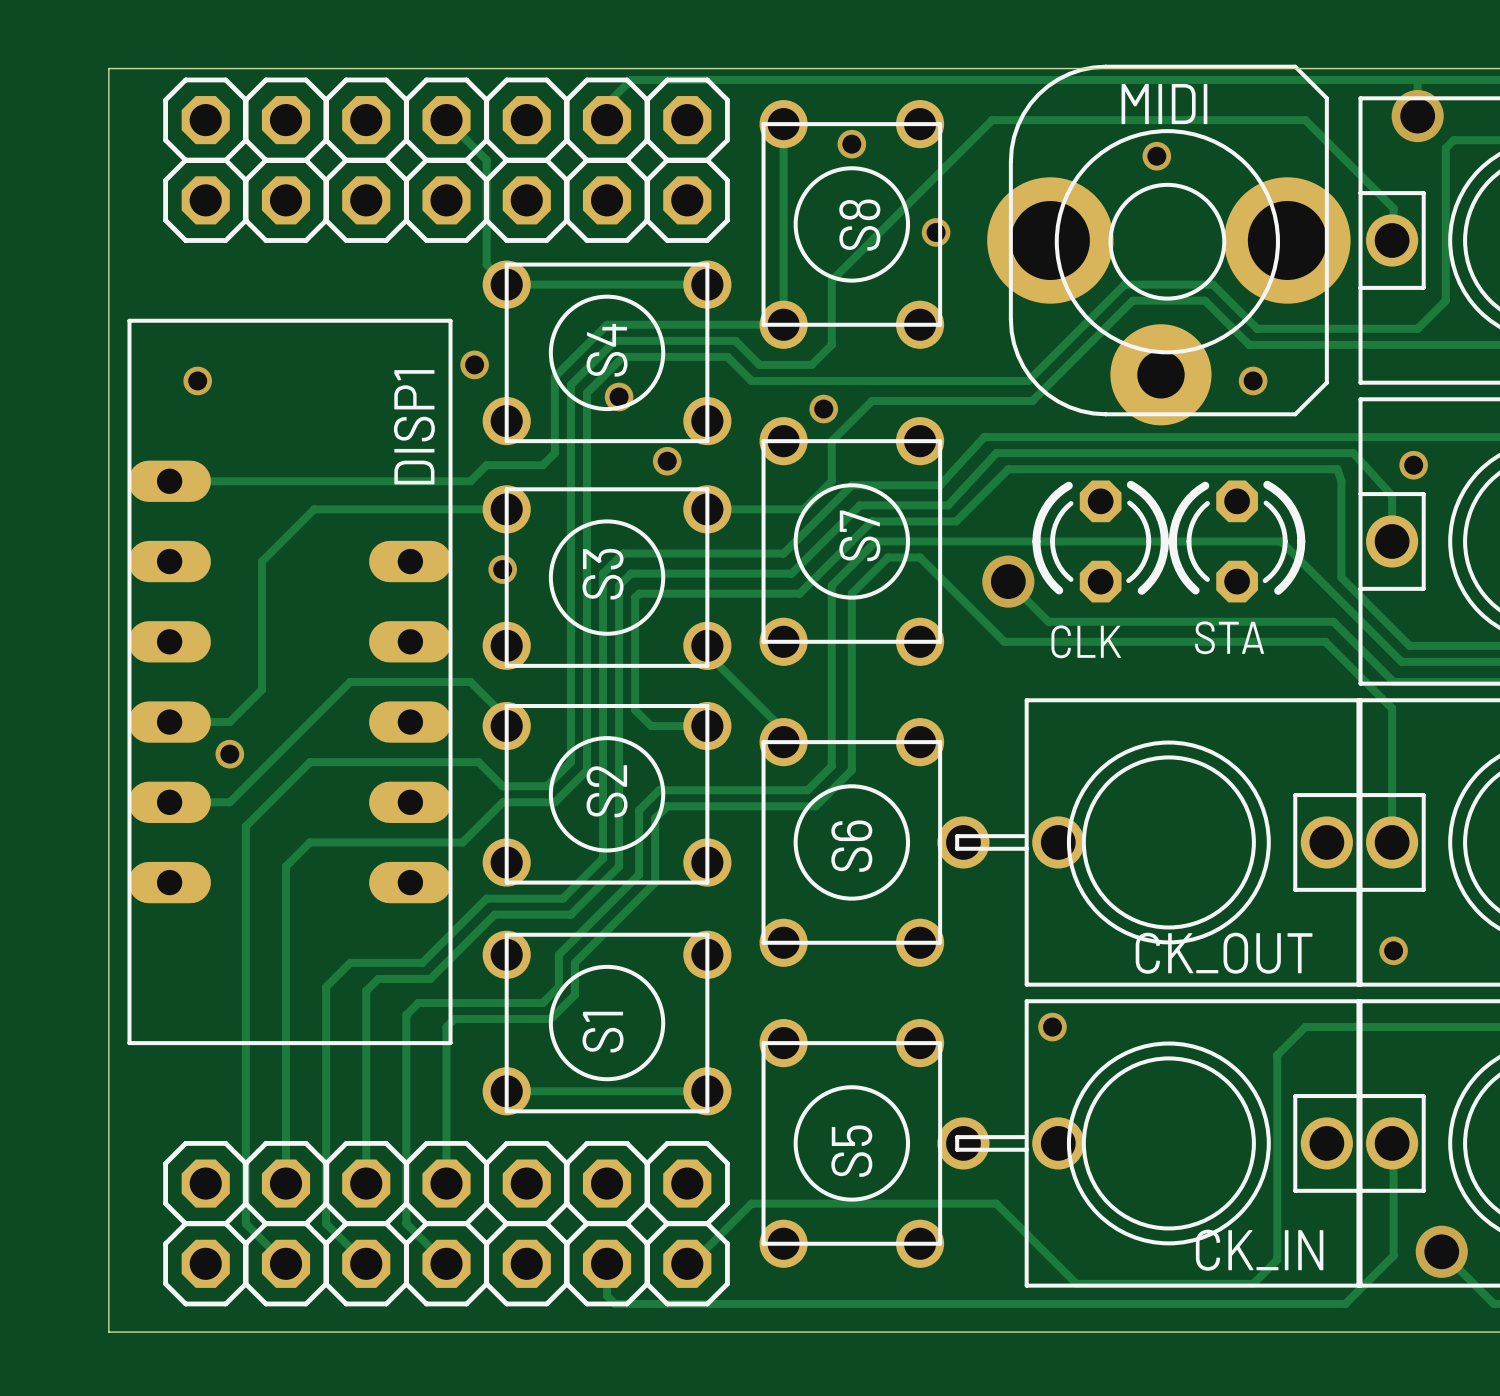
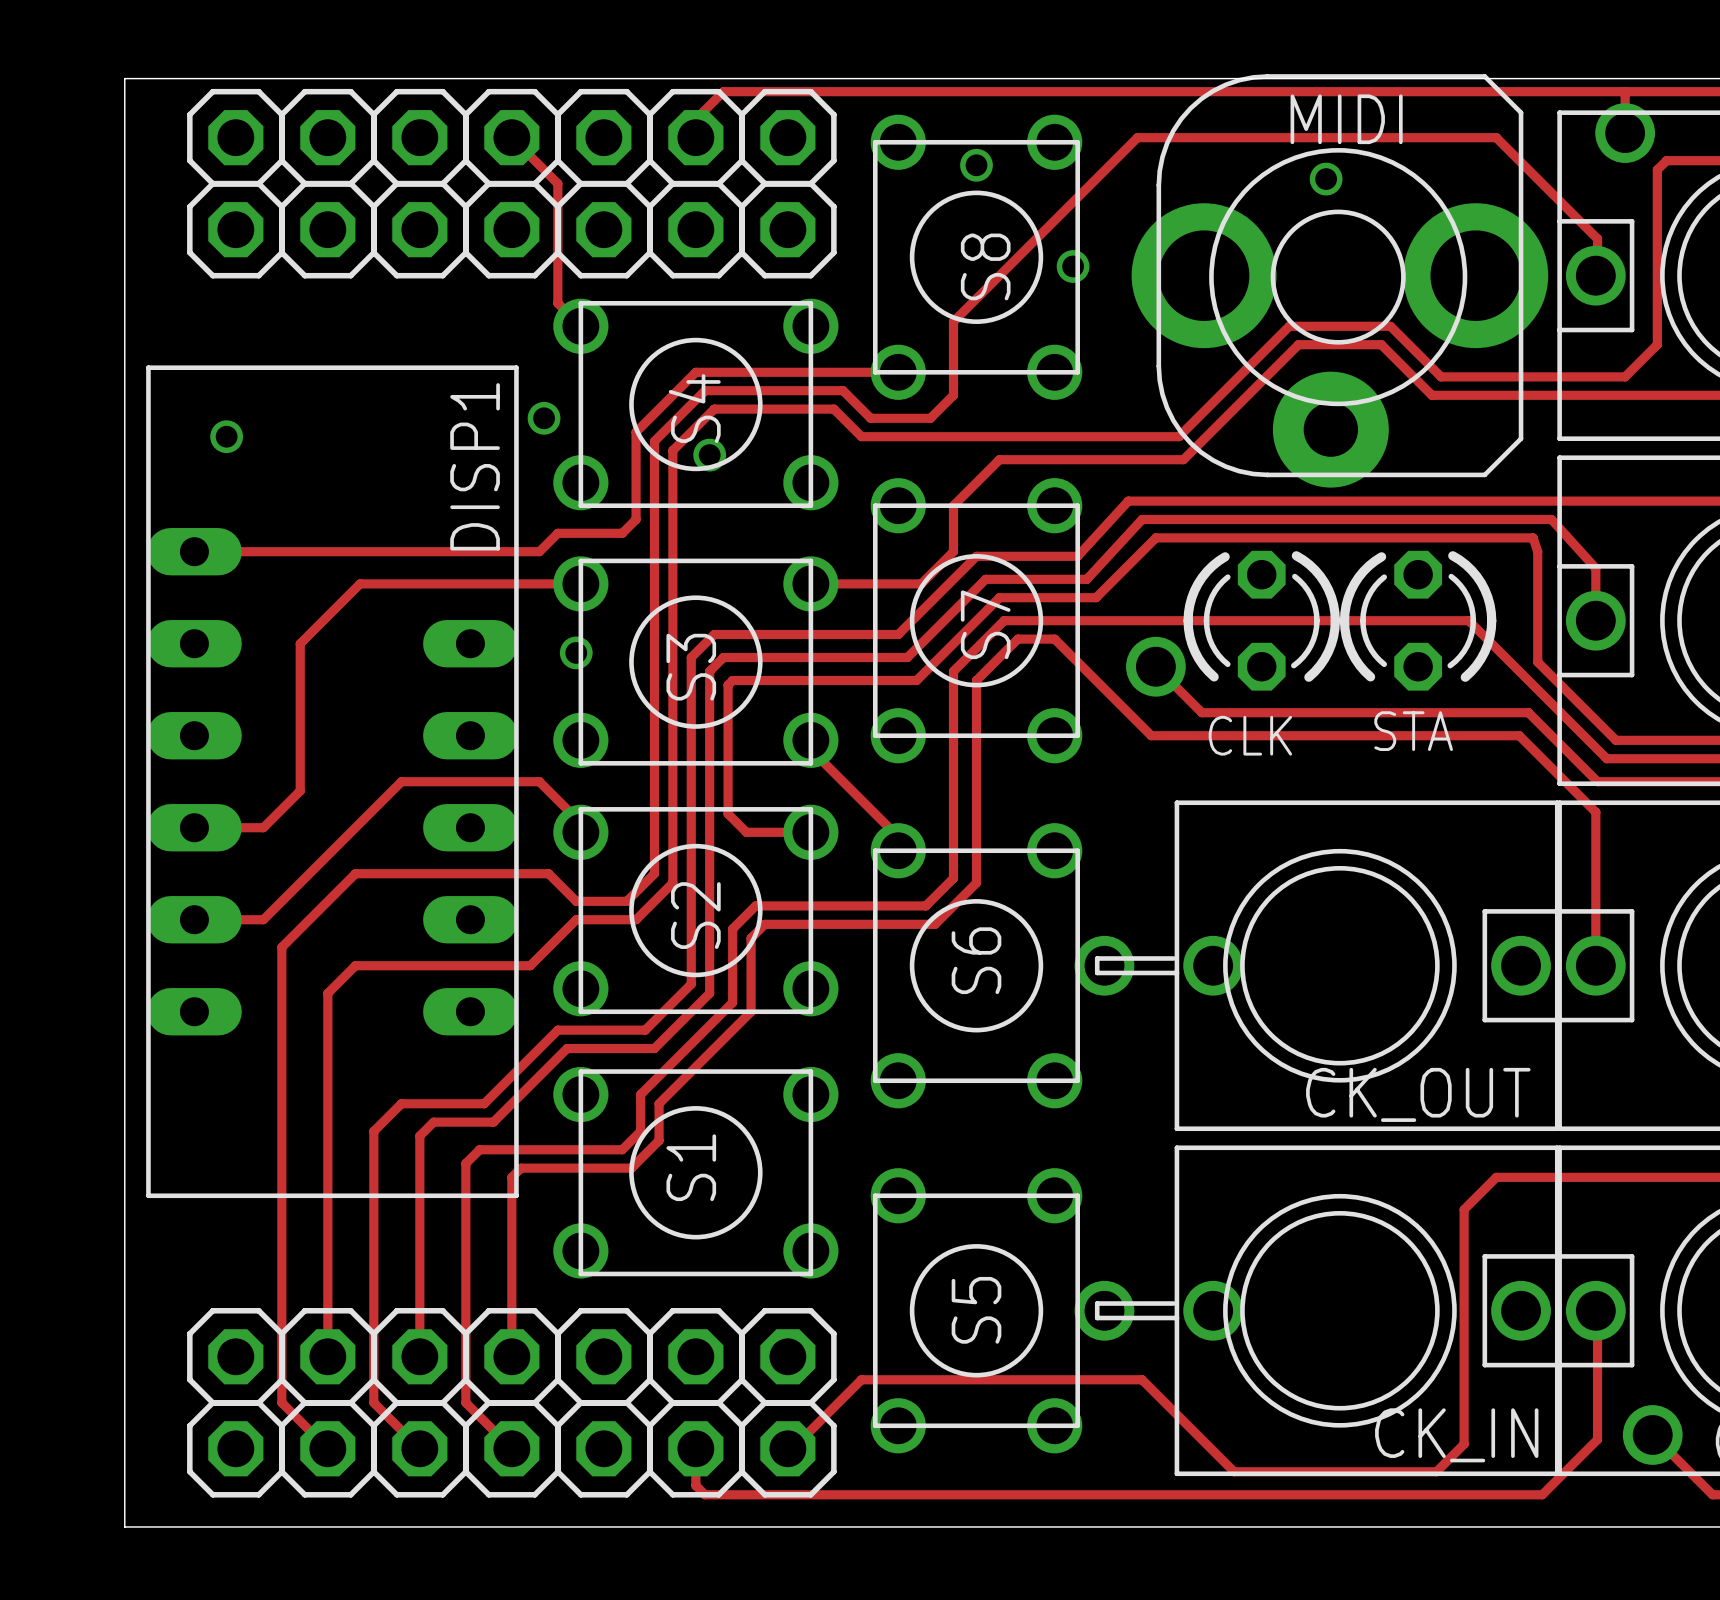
track: (783, 124) (783, 324) -> none
track: (506, 284) (707, 284) -> none
via: (1253, 380) -> none
via: (823, 409) -> none
via: (667, 461) -> none
via: (1413, 465) -> none
via: (229, 754) -> none
via: (1393, 950) -> none
via: (1052, 1027) -> none
track: (506, 1091) (707, 1091) -> none

